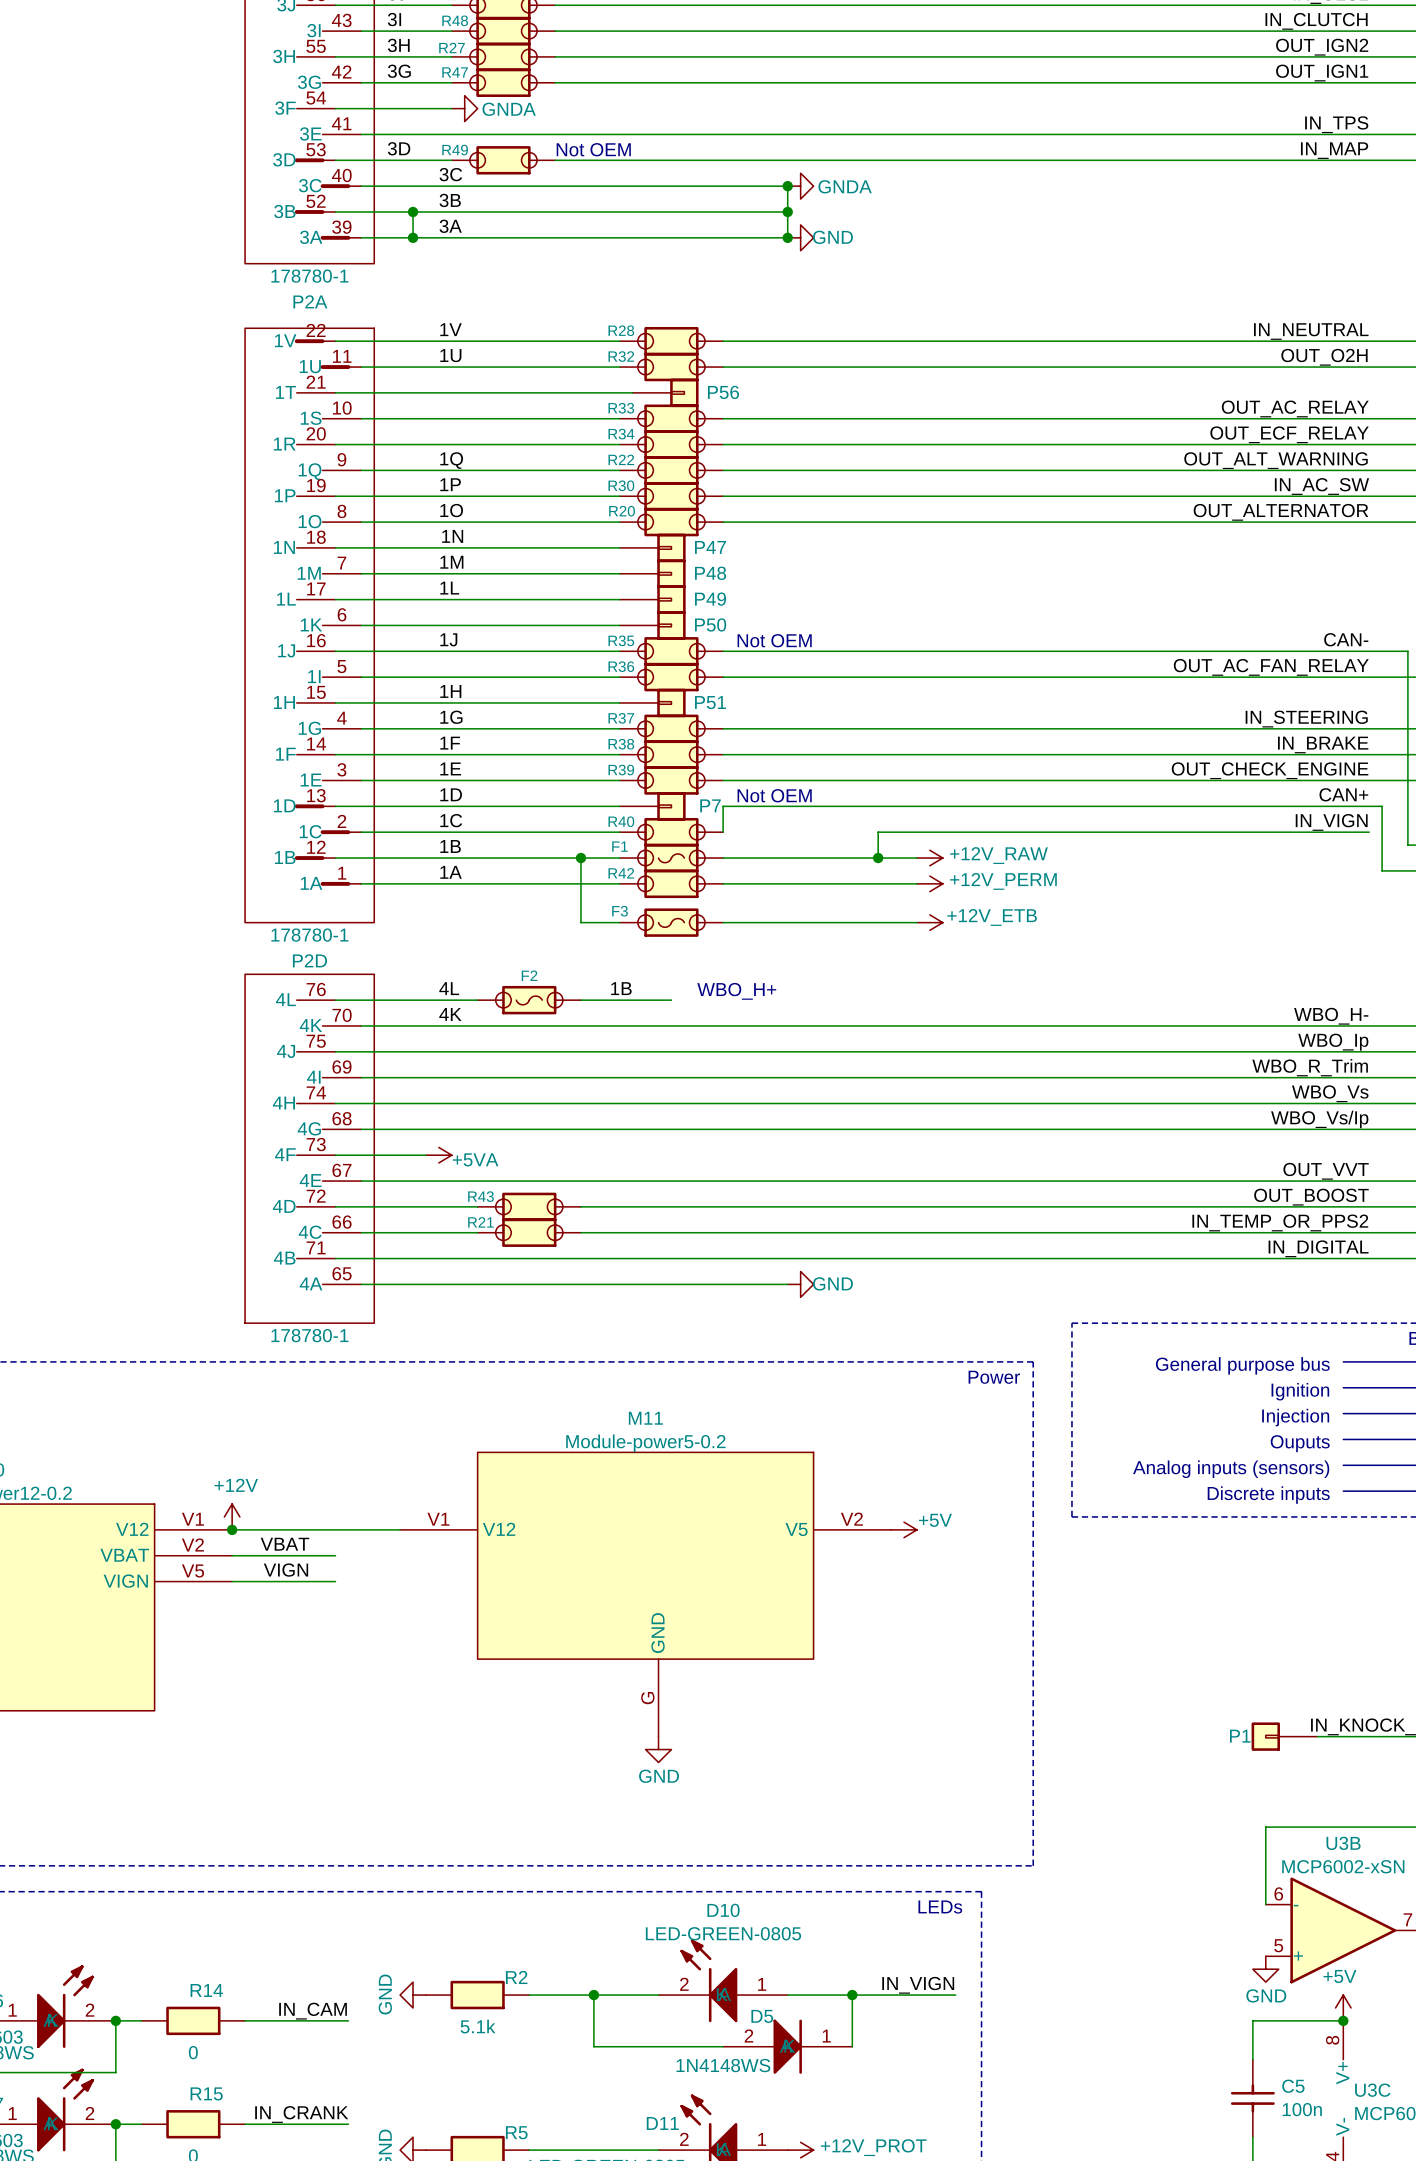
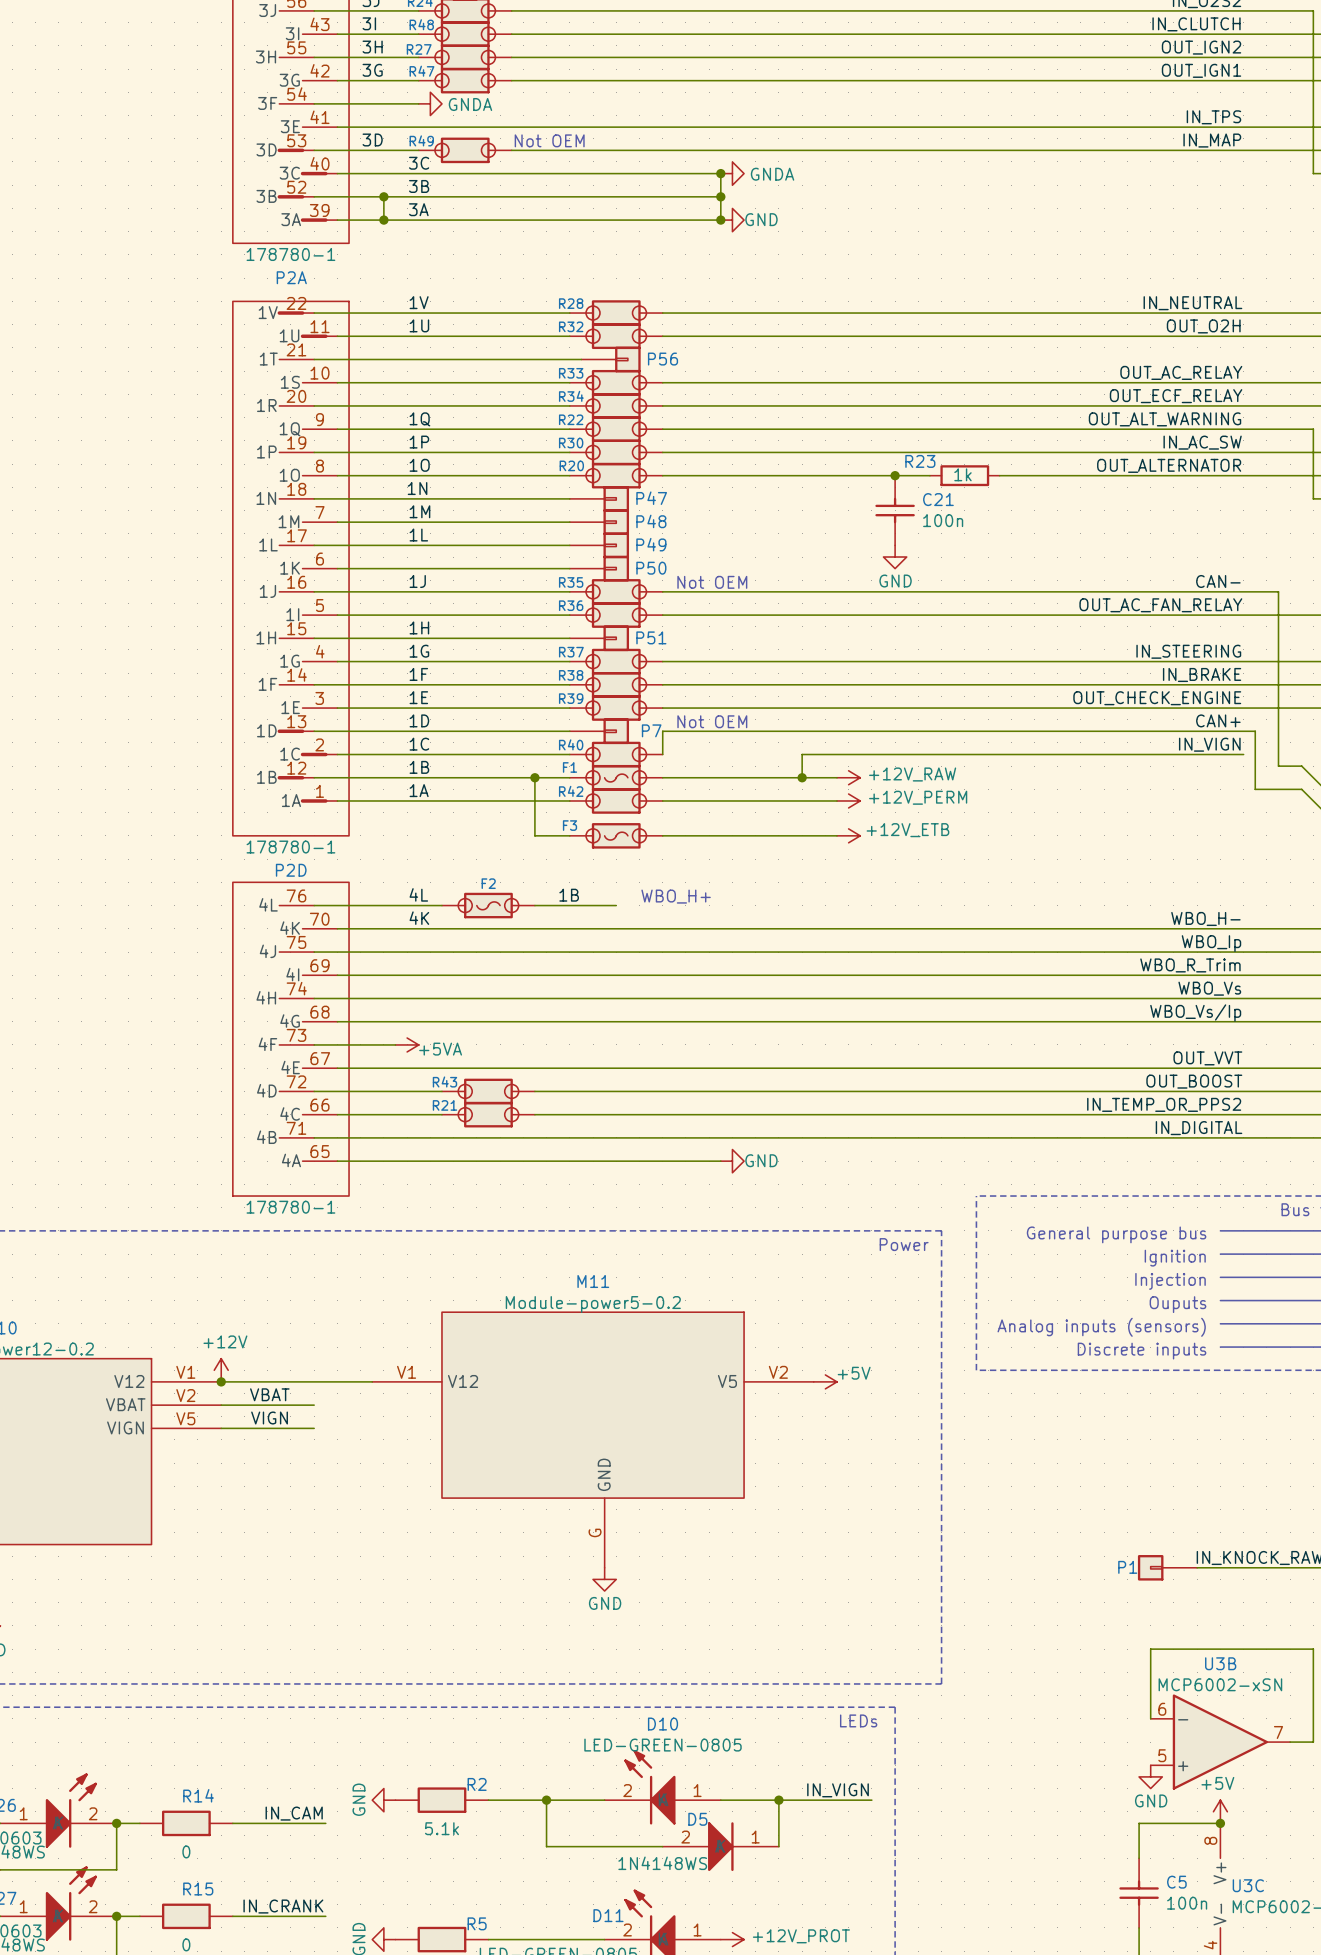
junction: none -> (895, 475)
wire: (1020, 522) (1097, 522) -> none
R23: none -> 1k (964, 475)
C21: none -> 100n (895, 510)
power symbol: none -> GND (895, 557)

